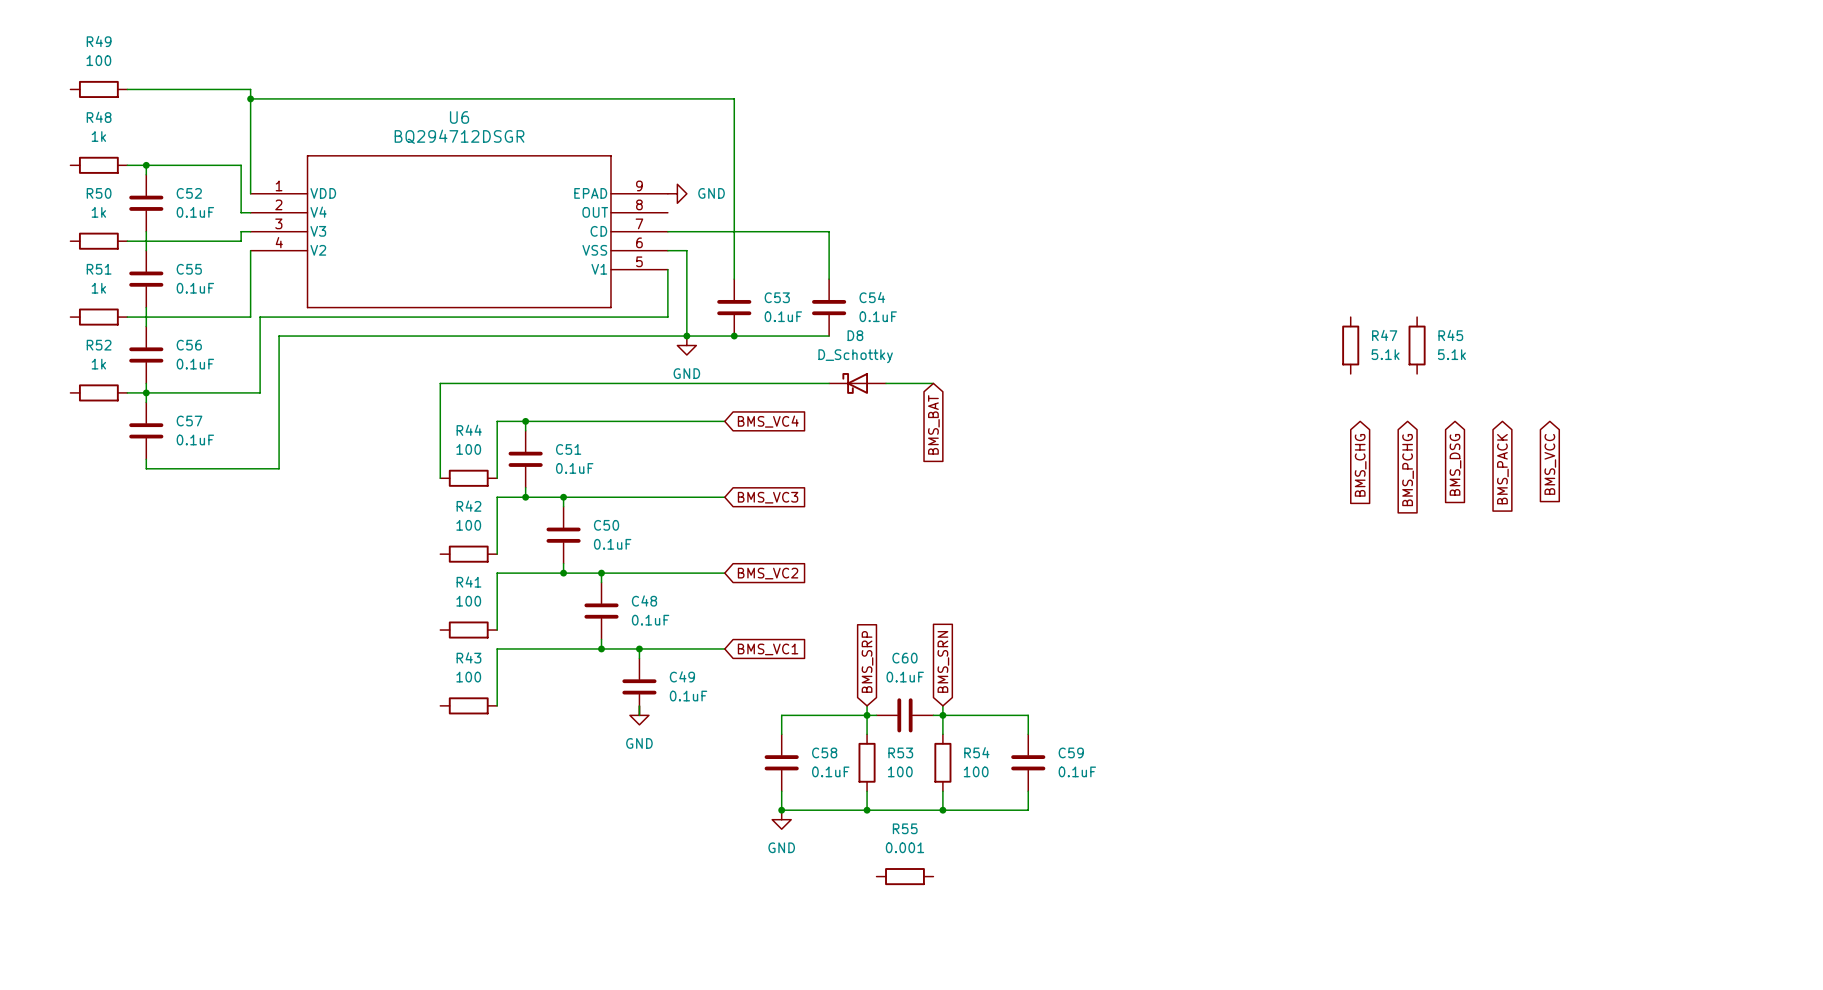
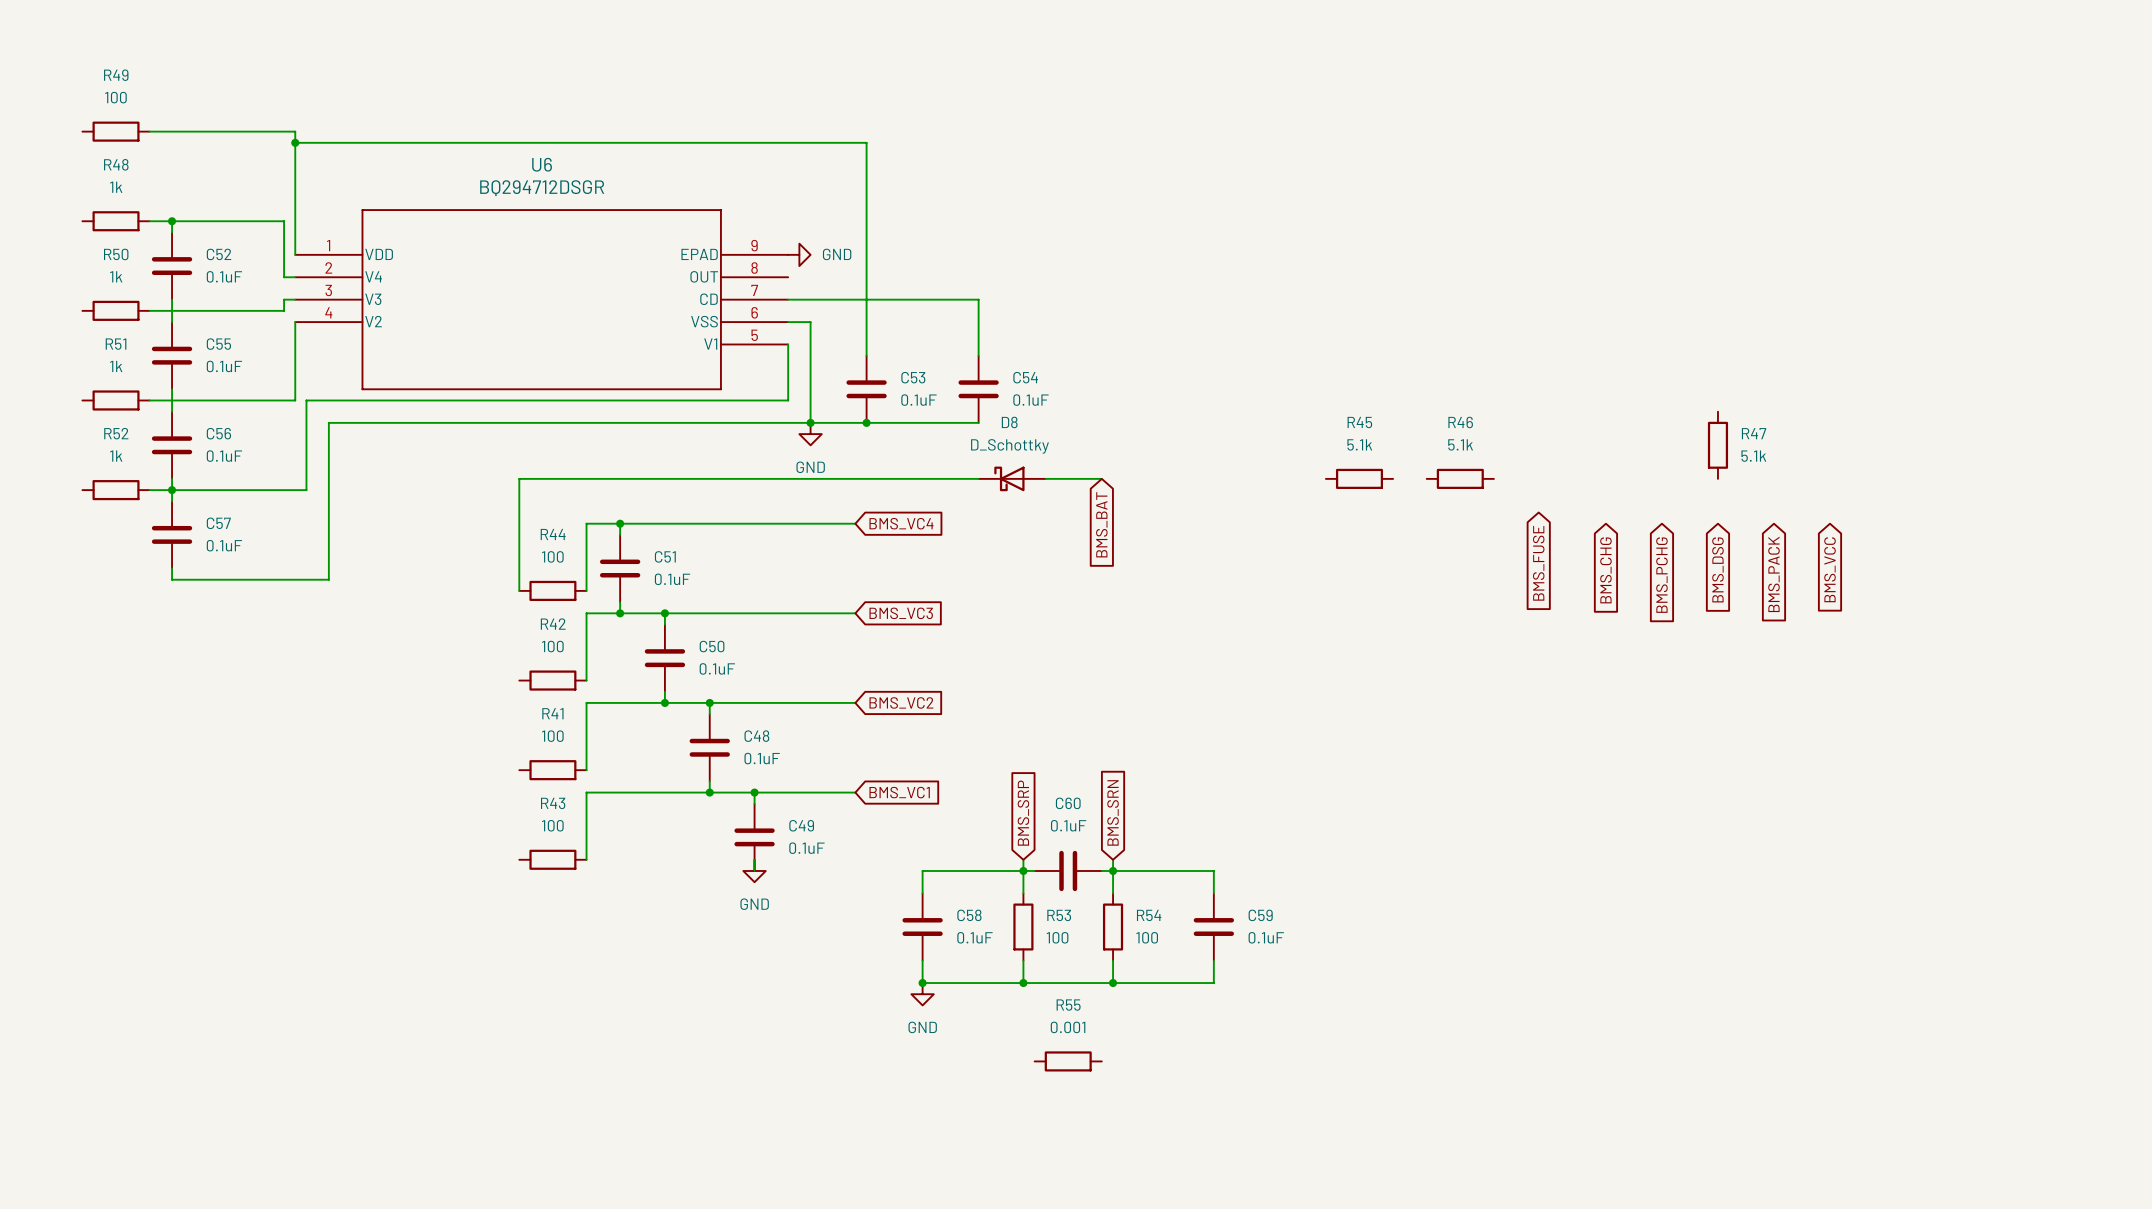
R45 name position: R45 (1450, 335) -> R45 (1359, 422)
R47 position: (1350, 345) -> (1717, 445)
R45 rotation: 0° (1417, 345) -> 90° clockwise (1359, 478)
R45 position: (1417, 345) -> (1359, 478)
R45 value position: 5.1k (1451, 354) -> 5.1k (1359, 444)
R46: none -> 5.1k (1460, 478)
global label: none -> BMS_FUSE (1538, 563)

